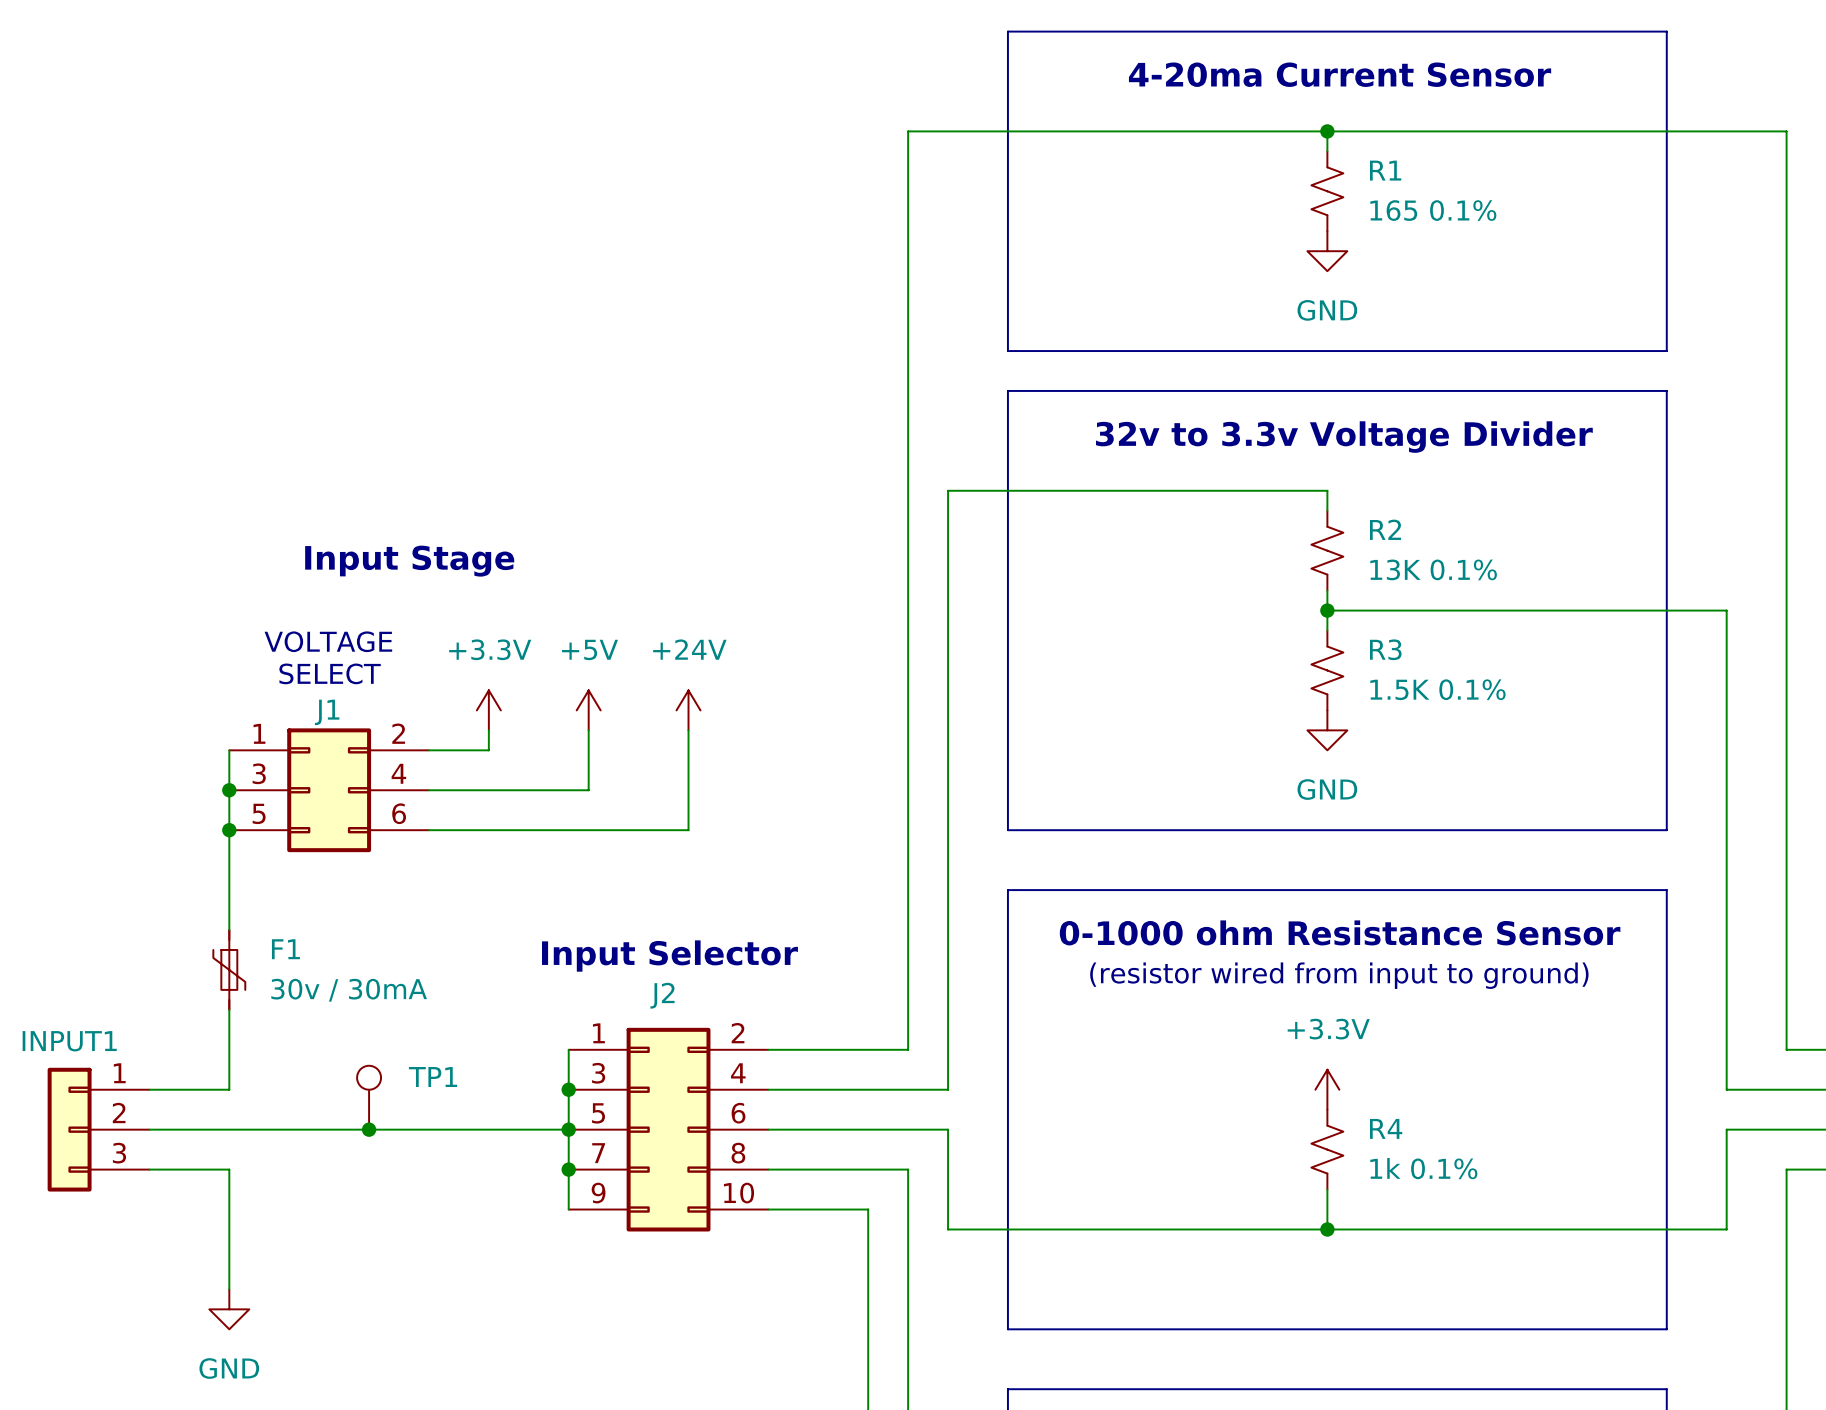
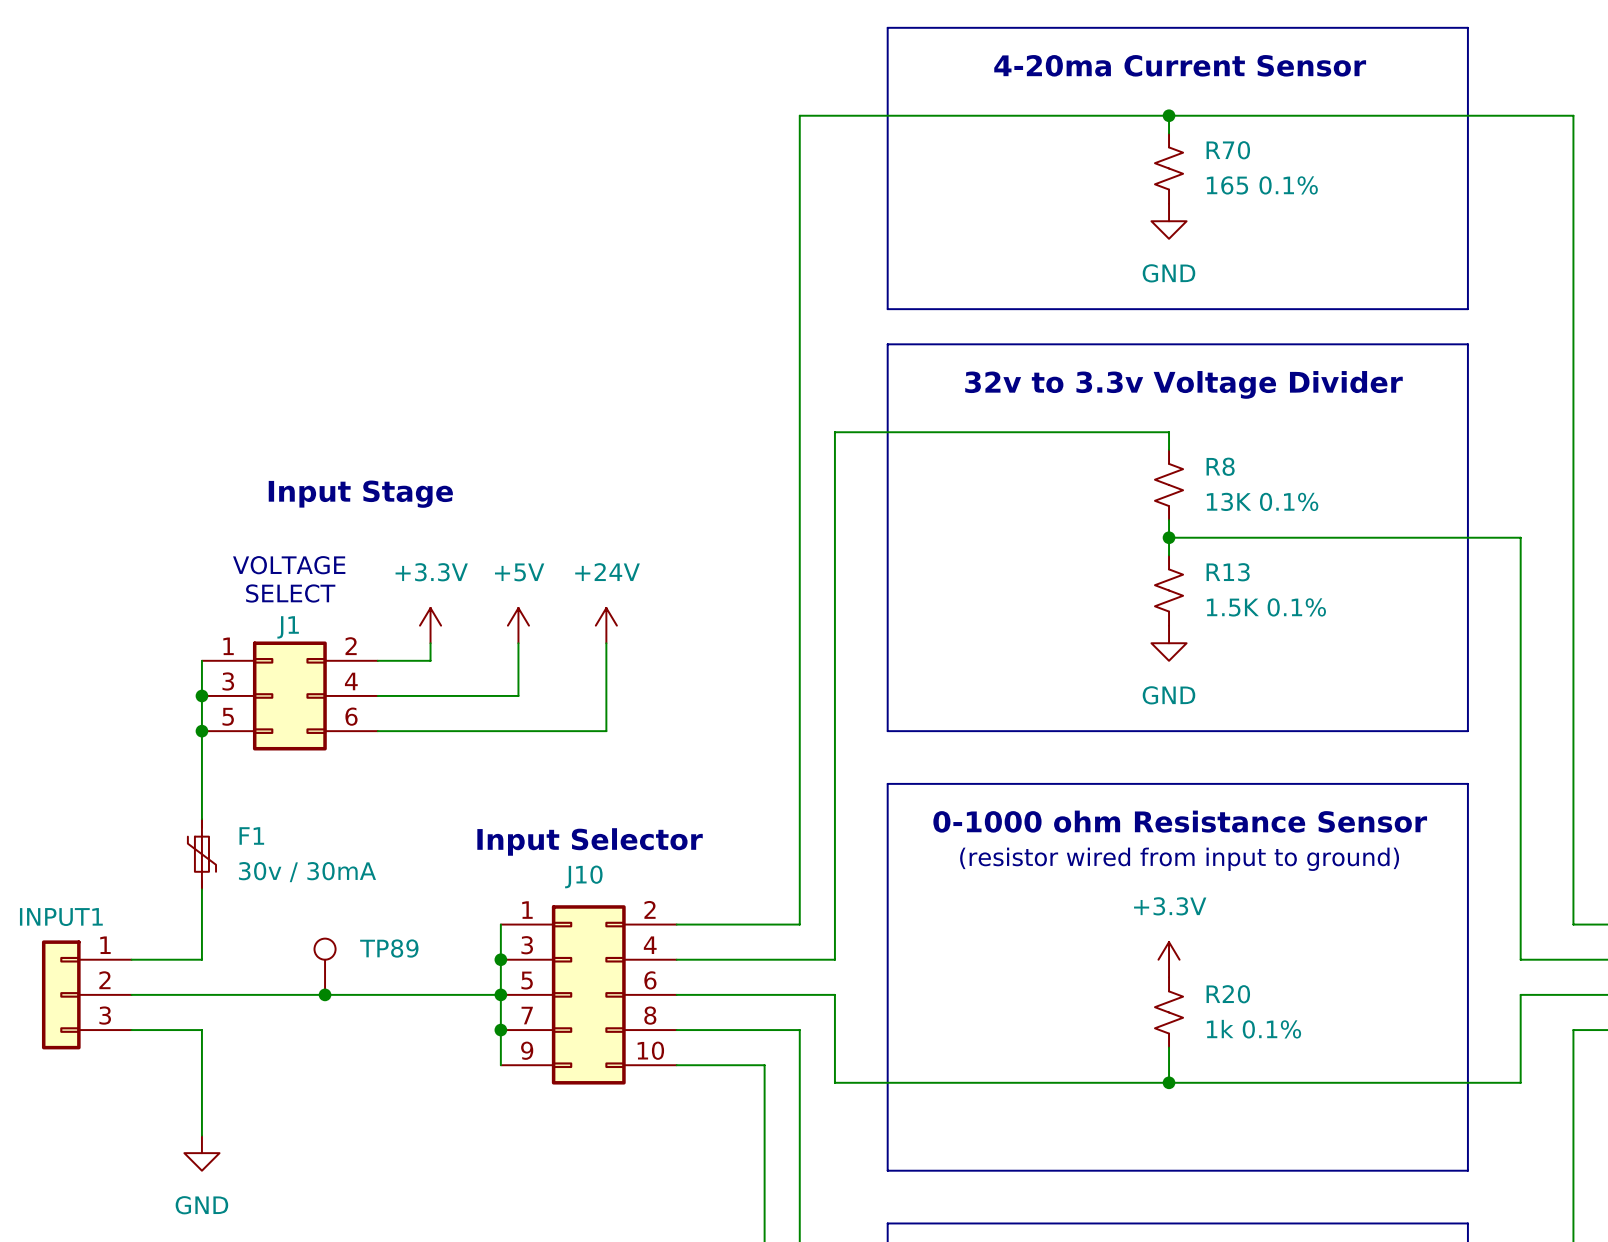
R1 name: R1 (1385, 170) -> R70 (1228, 150)
R2 name: R2 (1385, 529) -> R8 (1220, 466)
R3 name: R3 (1385, 649) -> R13 (1228, 572)
J2 name: J2 (662, 995) -> J10 (583, 876)
TP1 name: TP1 (433, 1077) -> TP89 (389, 948)
R4 name: R4 (1386, 1128) -> R20 (1228, 994)

